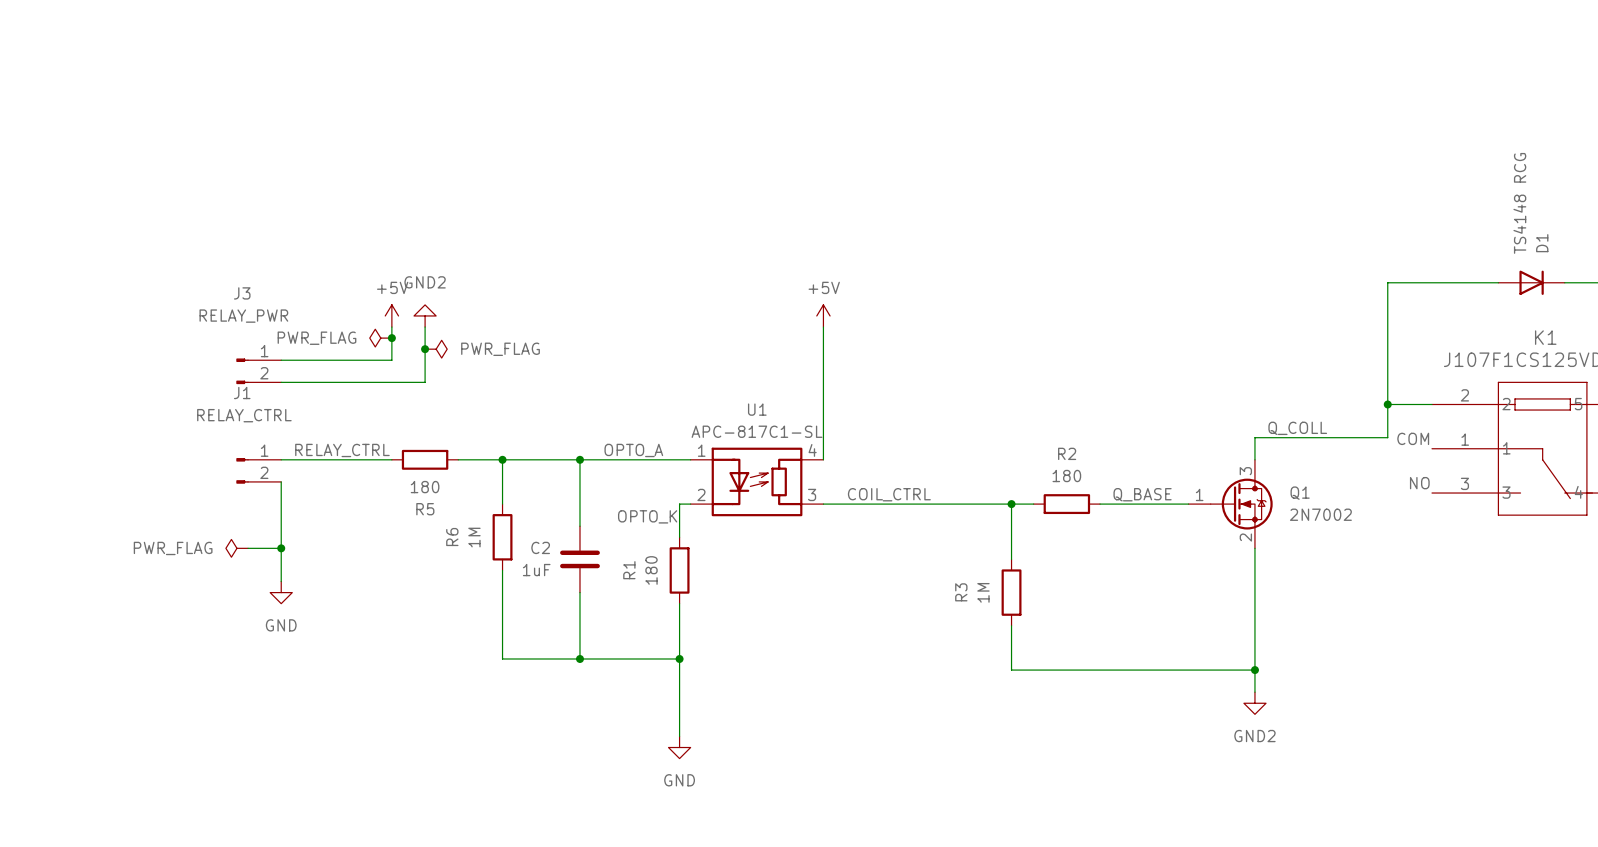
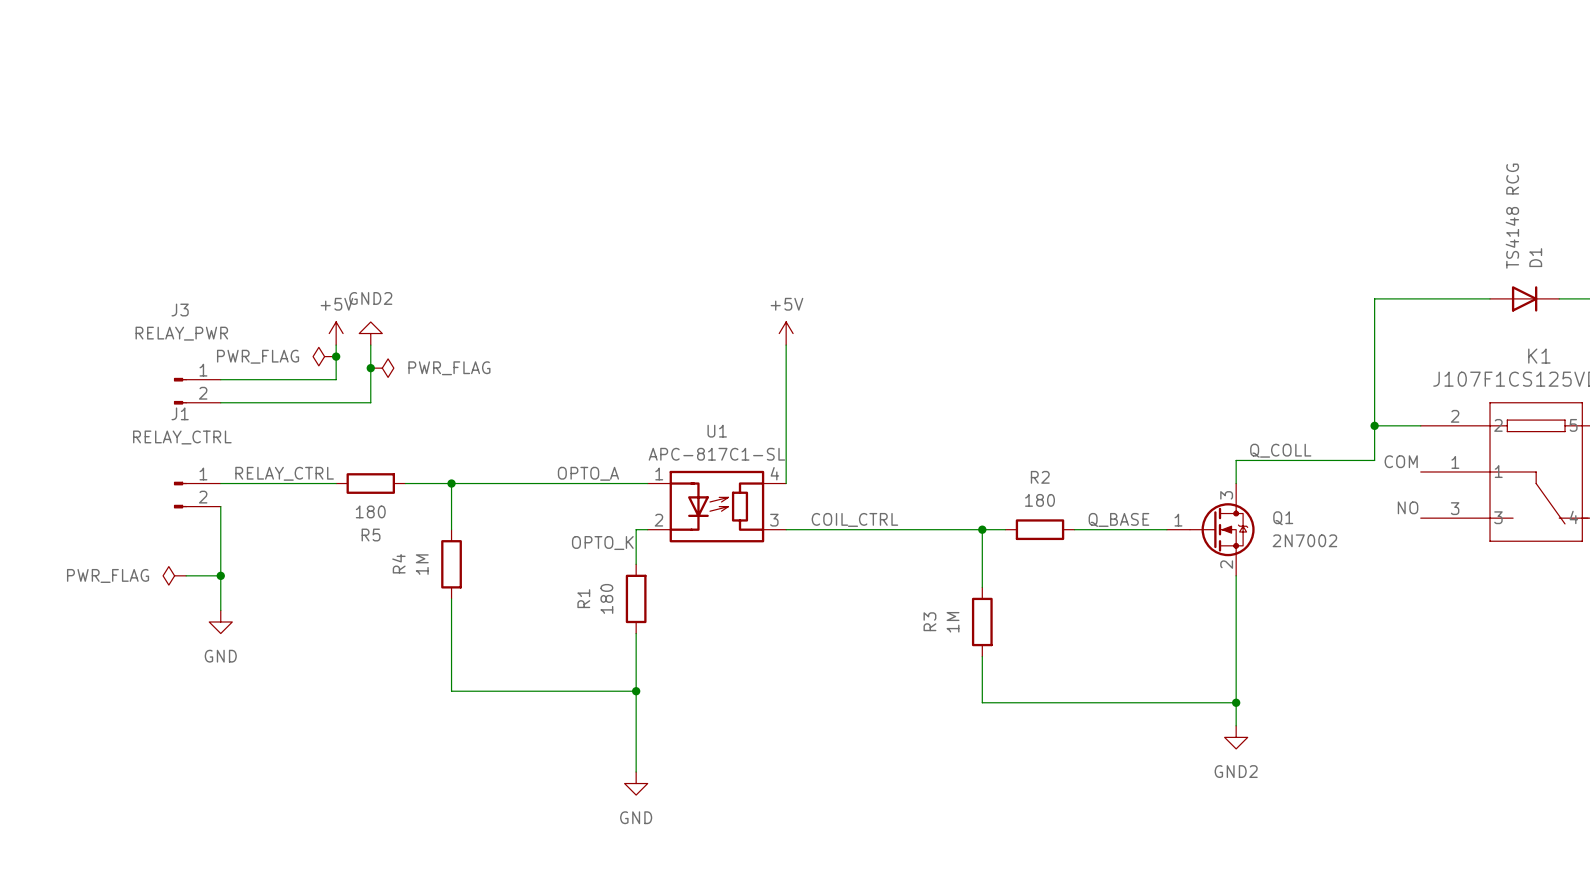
wire: (579, 459) (579, 526) -> none
junction: (579, 459) -> none
R6 name: R6 (452, 537) -> R4 (398, 563)
C2: 1uF (579, 559) -> none
wire: (579, 592) (579, 658) -> none
junction: (579, 658) -> none

